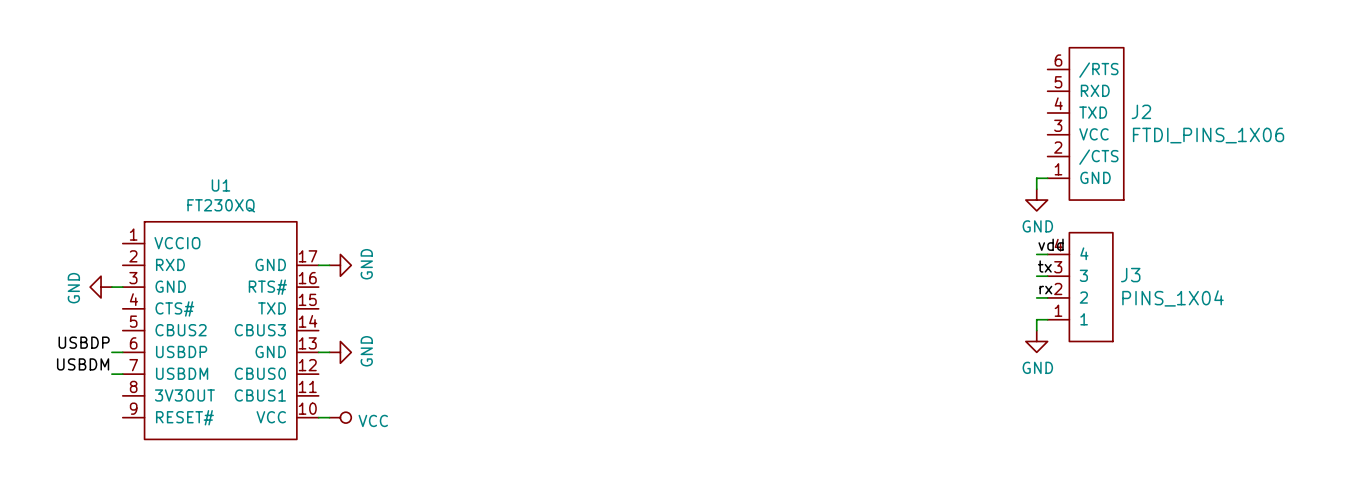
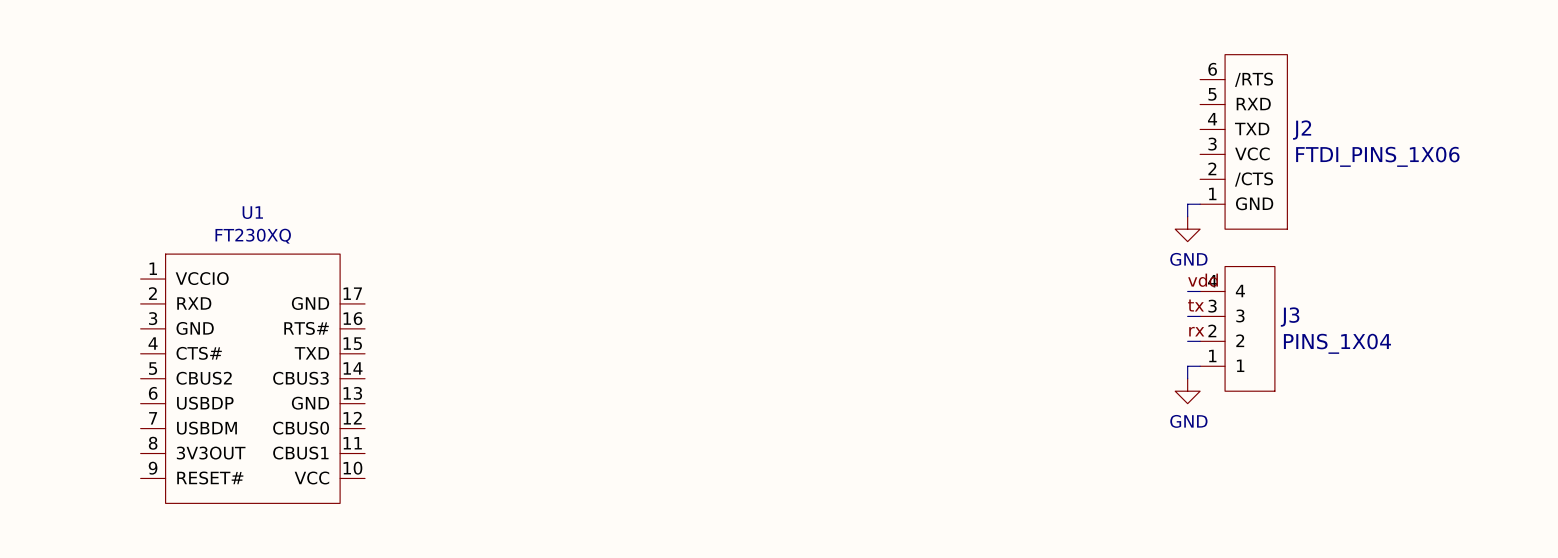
wire: (318, 265) (329, 265) -> none
power symbol: GND (340, 265) -> none
power symbol: GND (101, 287) -> none
wire: (111, 287) (122, 287) -> none
label: USBDP (84, 342) -> none
wire: (111, 352) (122, 352) -> none
wire: (318, 352) (329, 352) -> none
power symbol: GND (340, 352) -> none
label: USBDM (83, 364) -> none
wire: (111, 374) (122, 374) -> none
wire: (318, 417) (329, 417) -> none
power symbol: VCC (340, 417) -> none

